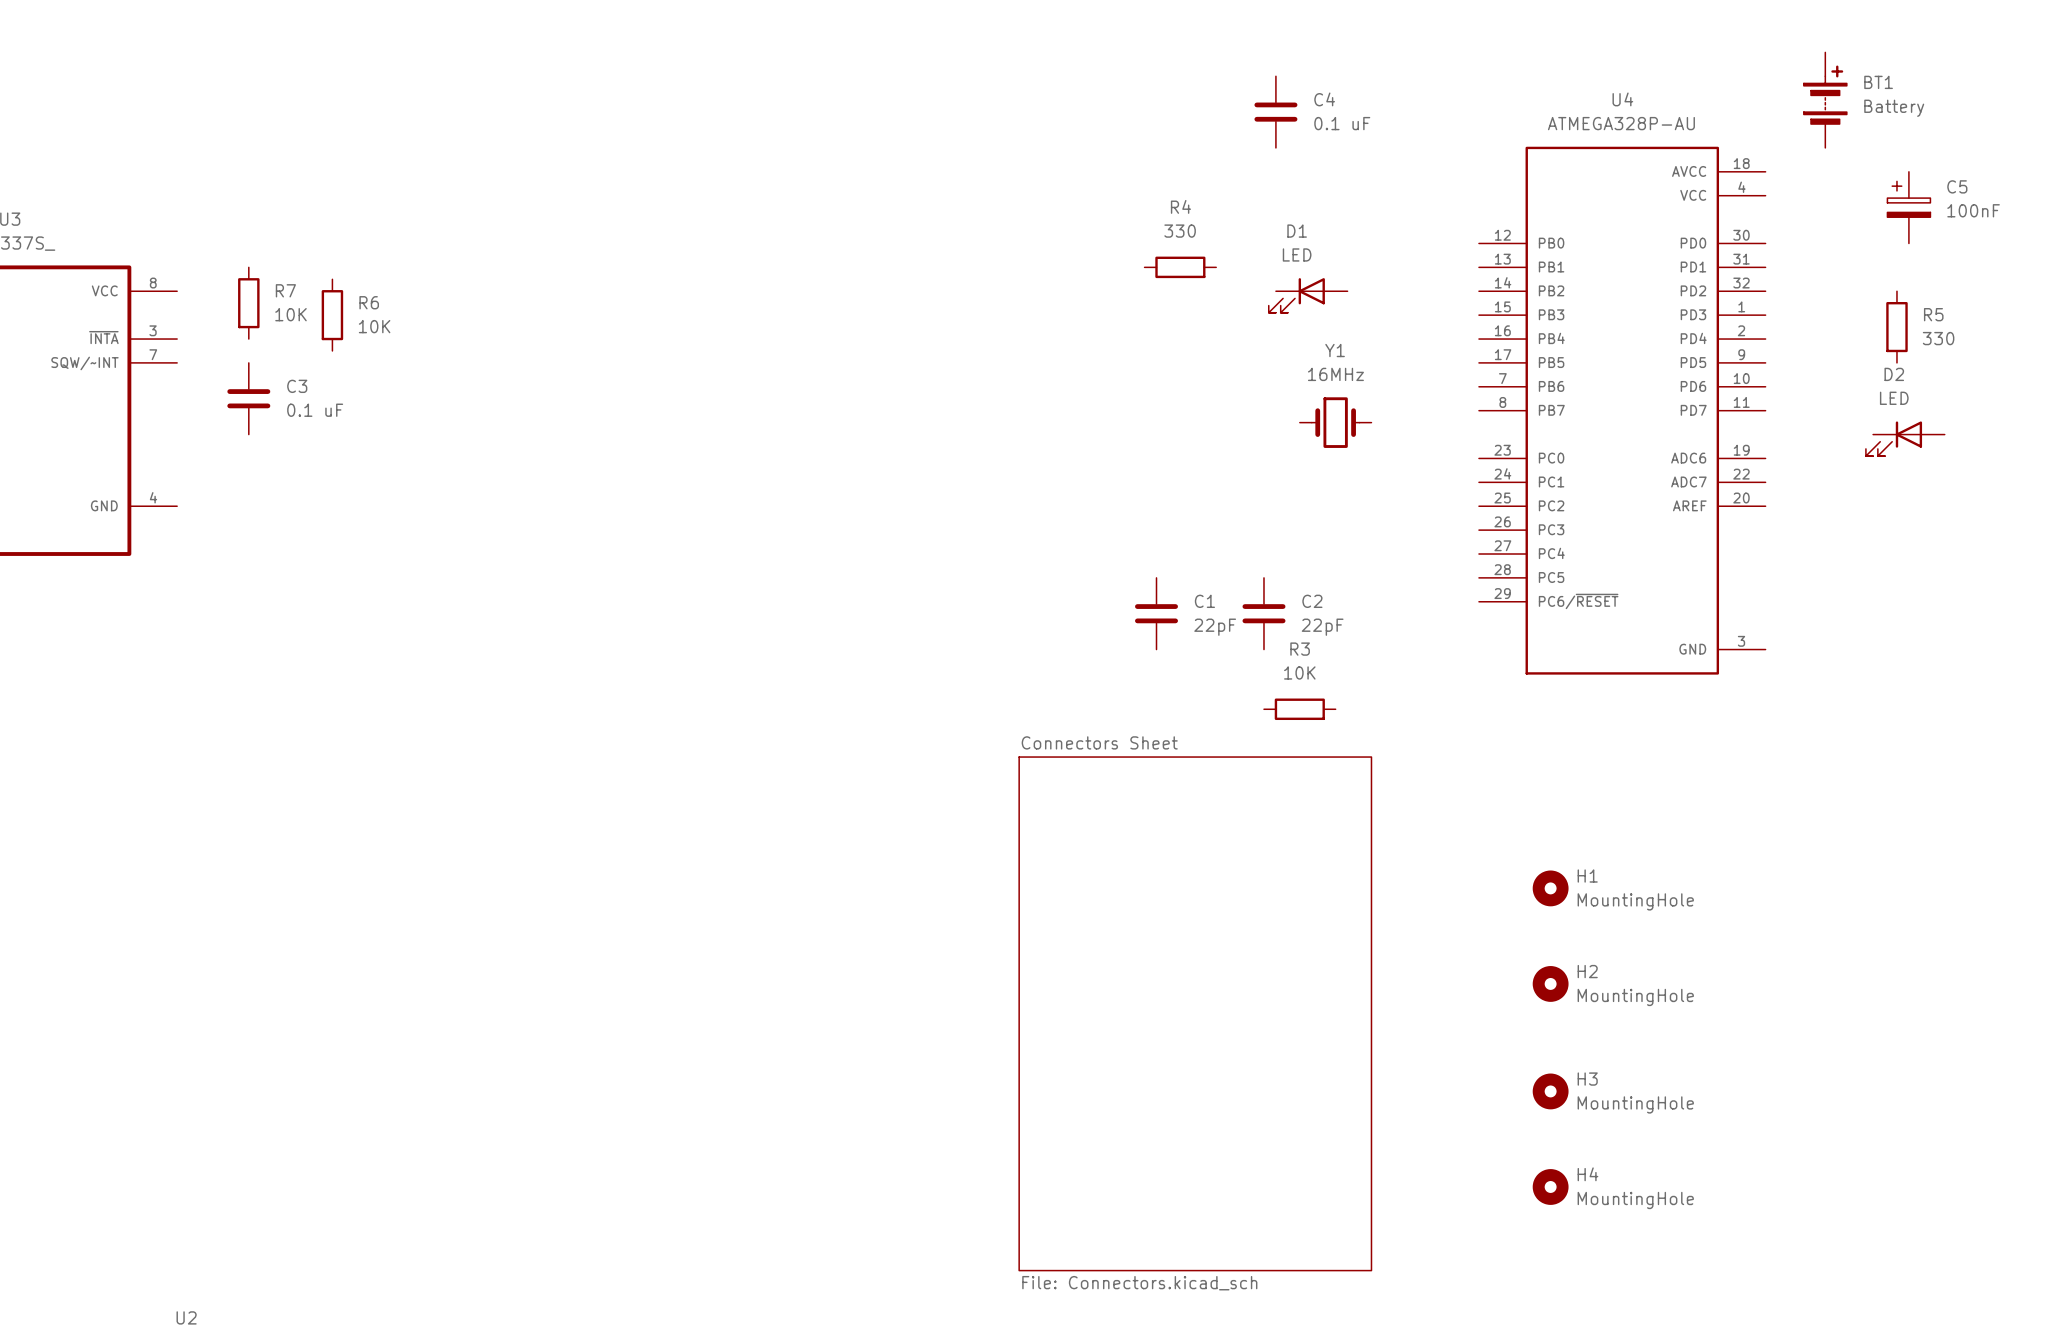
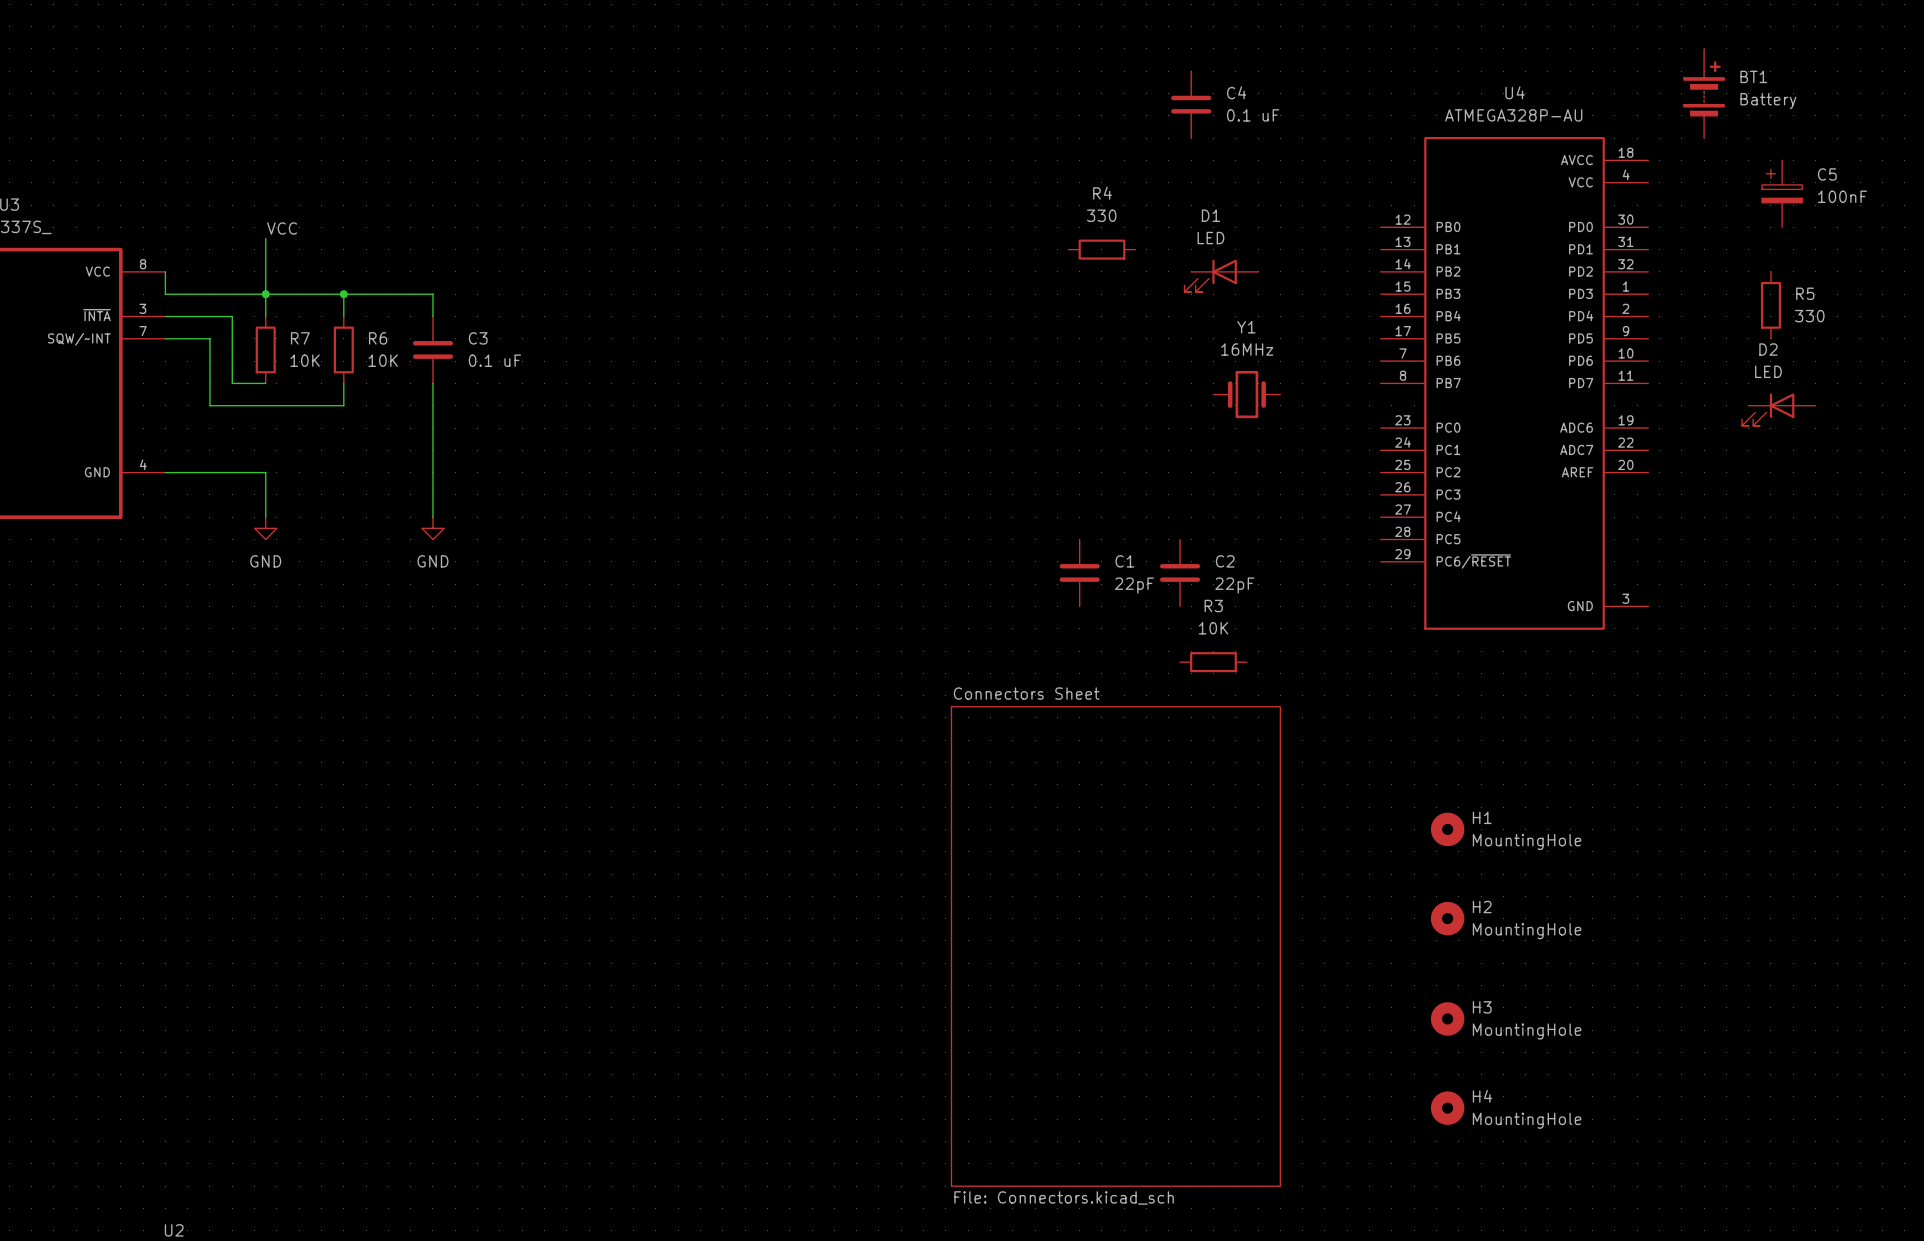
label: none -> VCC (282, 228)
wire: none -> (265, 238) (265, 316)
wire: none -> (165, 271) (165, 294) (432, 294) (432, 316)
R7 position: (248, 303) -> (265, 349)
junction: none -> (265, 294)
R6 position: (332, 315) -> (343, 349)
wire: none -> (343, 294) (343, 316)
junction: none -> (343, 294)
wire: none -> (165, 316) (232, 316) (232, 383) (265, 383)
wire: none -> (165, 338) (209, 338) (209, 405) (343, 405) (343, 383)
C3 position: (248, 398) -> (432, 349)
wire: none -> (432, 383) (432, 517)
wire: none -> (165, 472) (265, 472) (265, 517)
power symbol: none -> GND (265, 528)
power symbol: none -> GND (432, 528)

